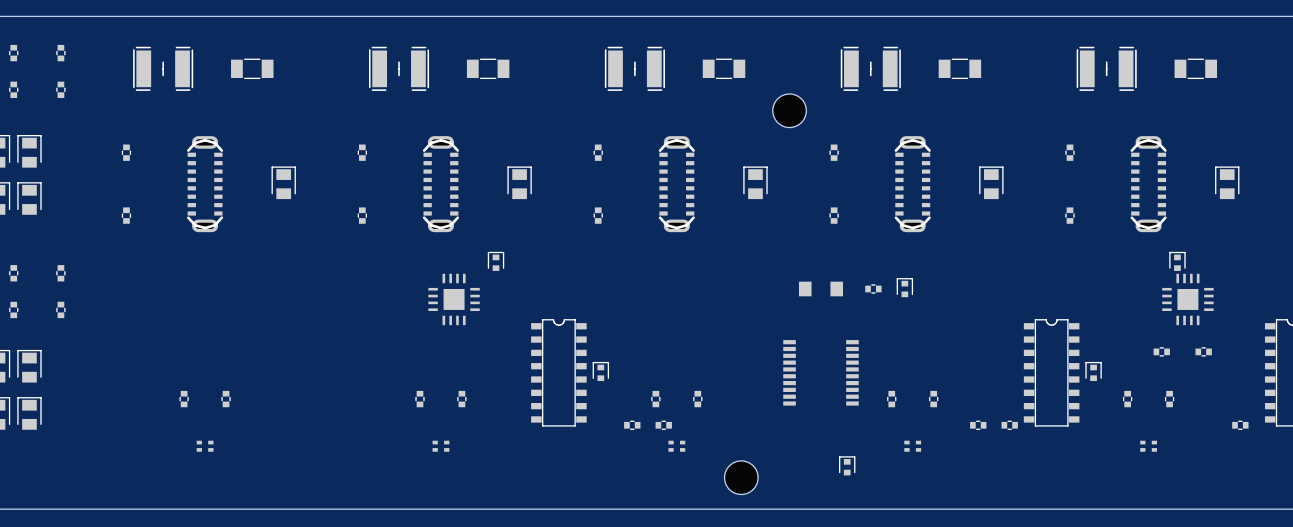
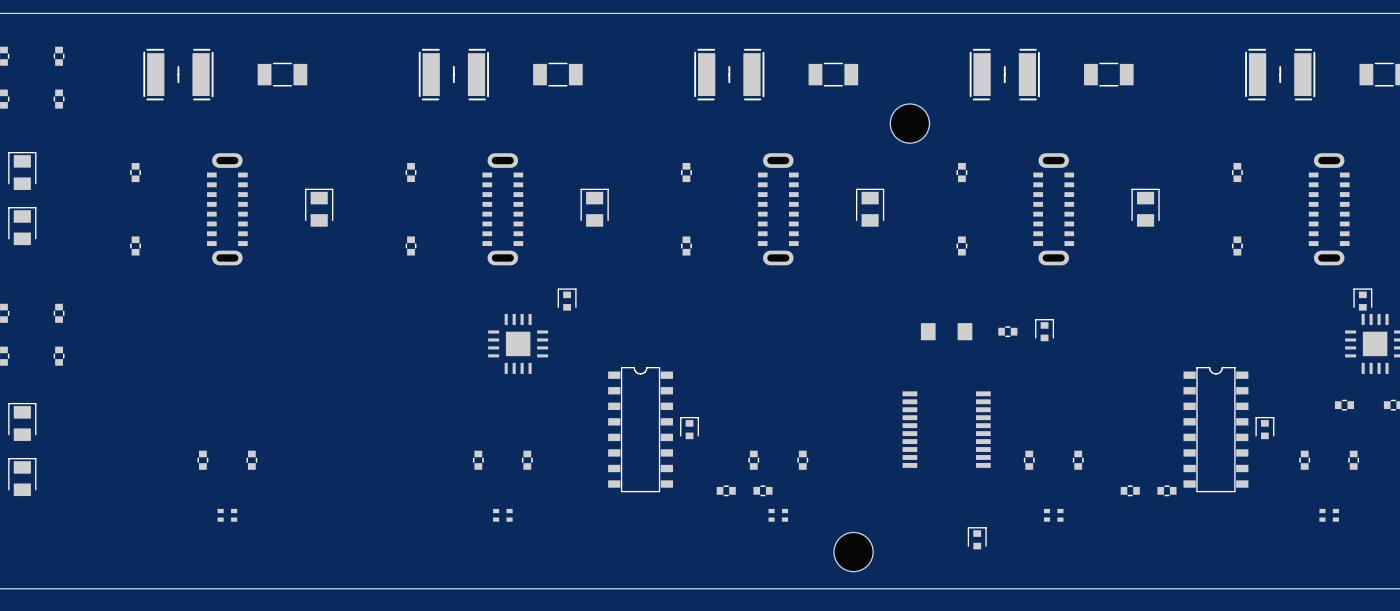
part footprint: [186, 136, 224, 233] -> [207, 153, 248, 266]
part footprint: [422, 136, 460, 233] -> [482, 153, 524, 266]
part footprint: [658, 136, 695, 233] -> [757, 153, 799, 266]
part footprint: [894, 136, 931, 233] -> [1033, 153, 1075, 266]
part footprint: [1130, 136, 1167, 233] -> [1308, 153, 1350, 266]

